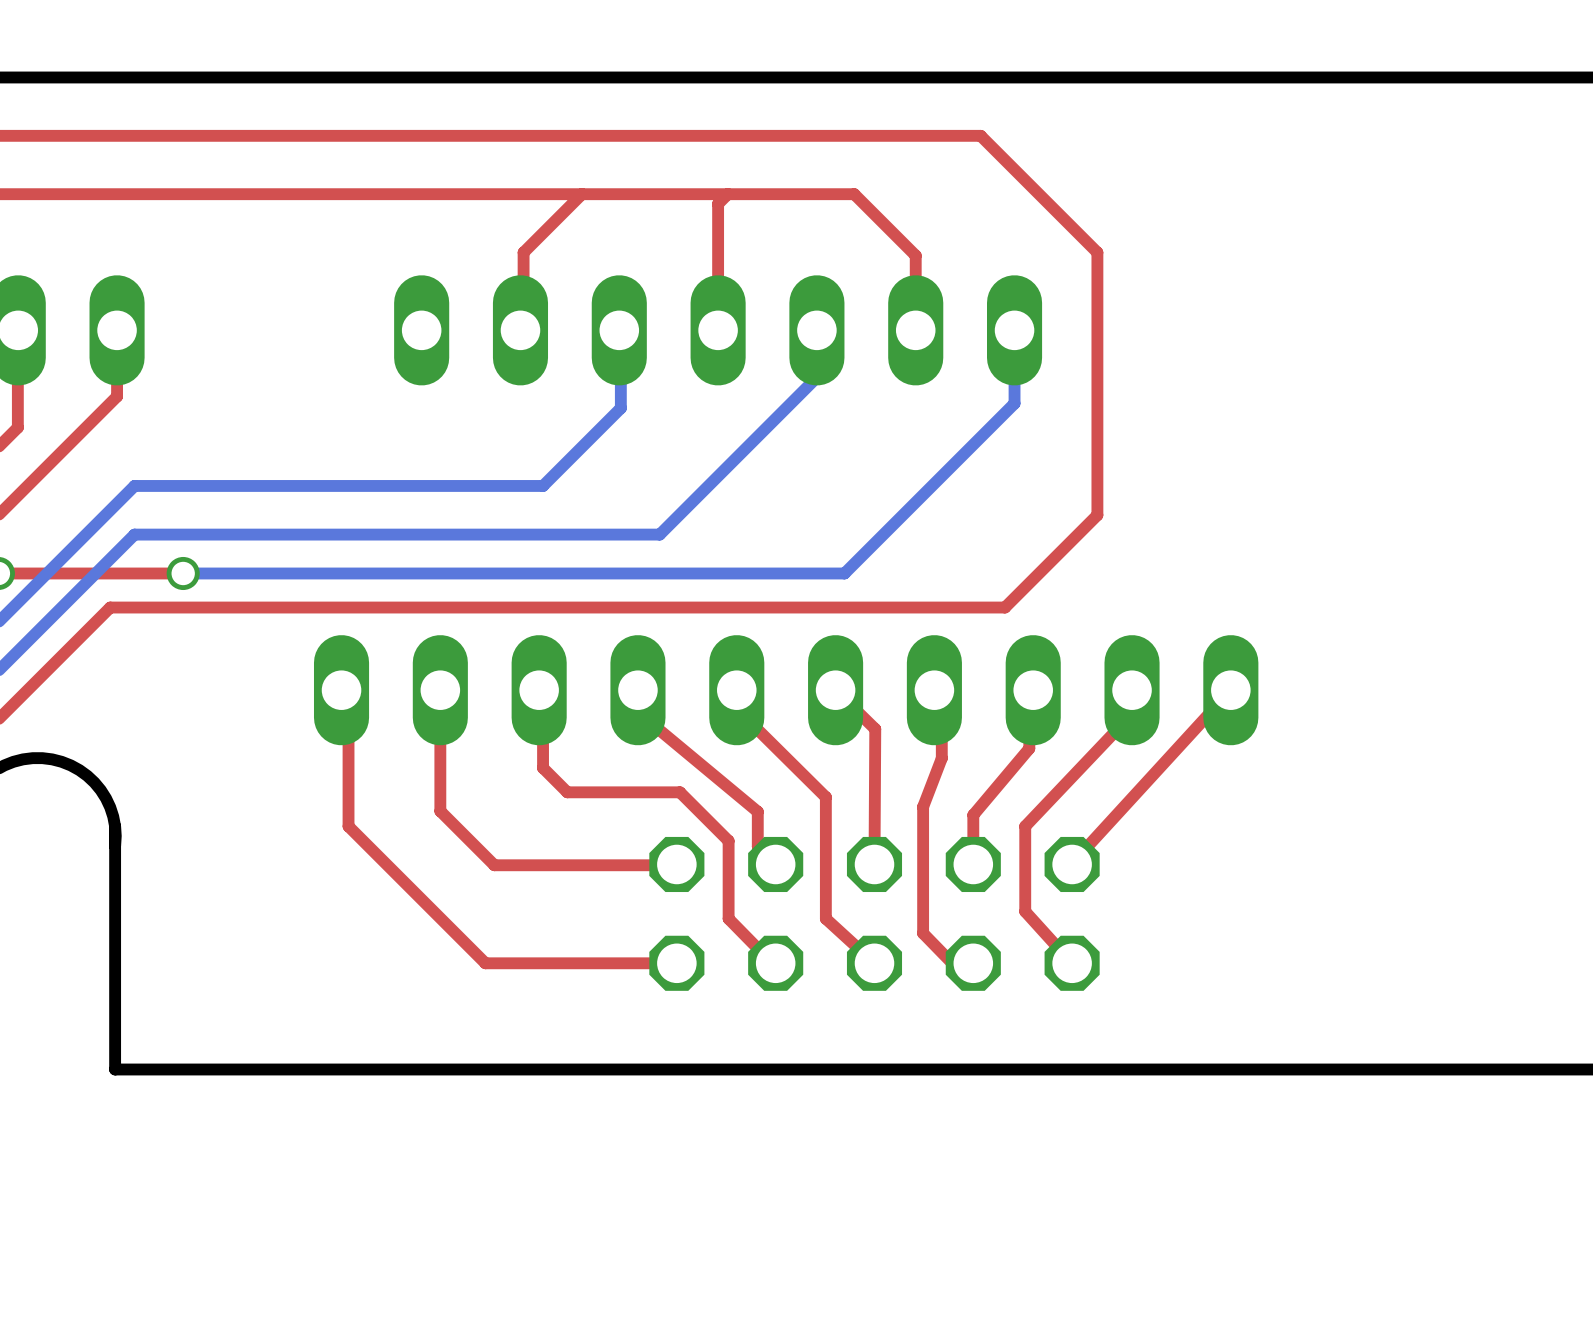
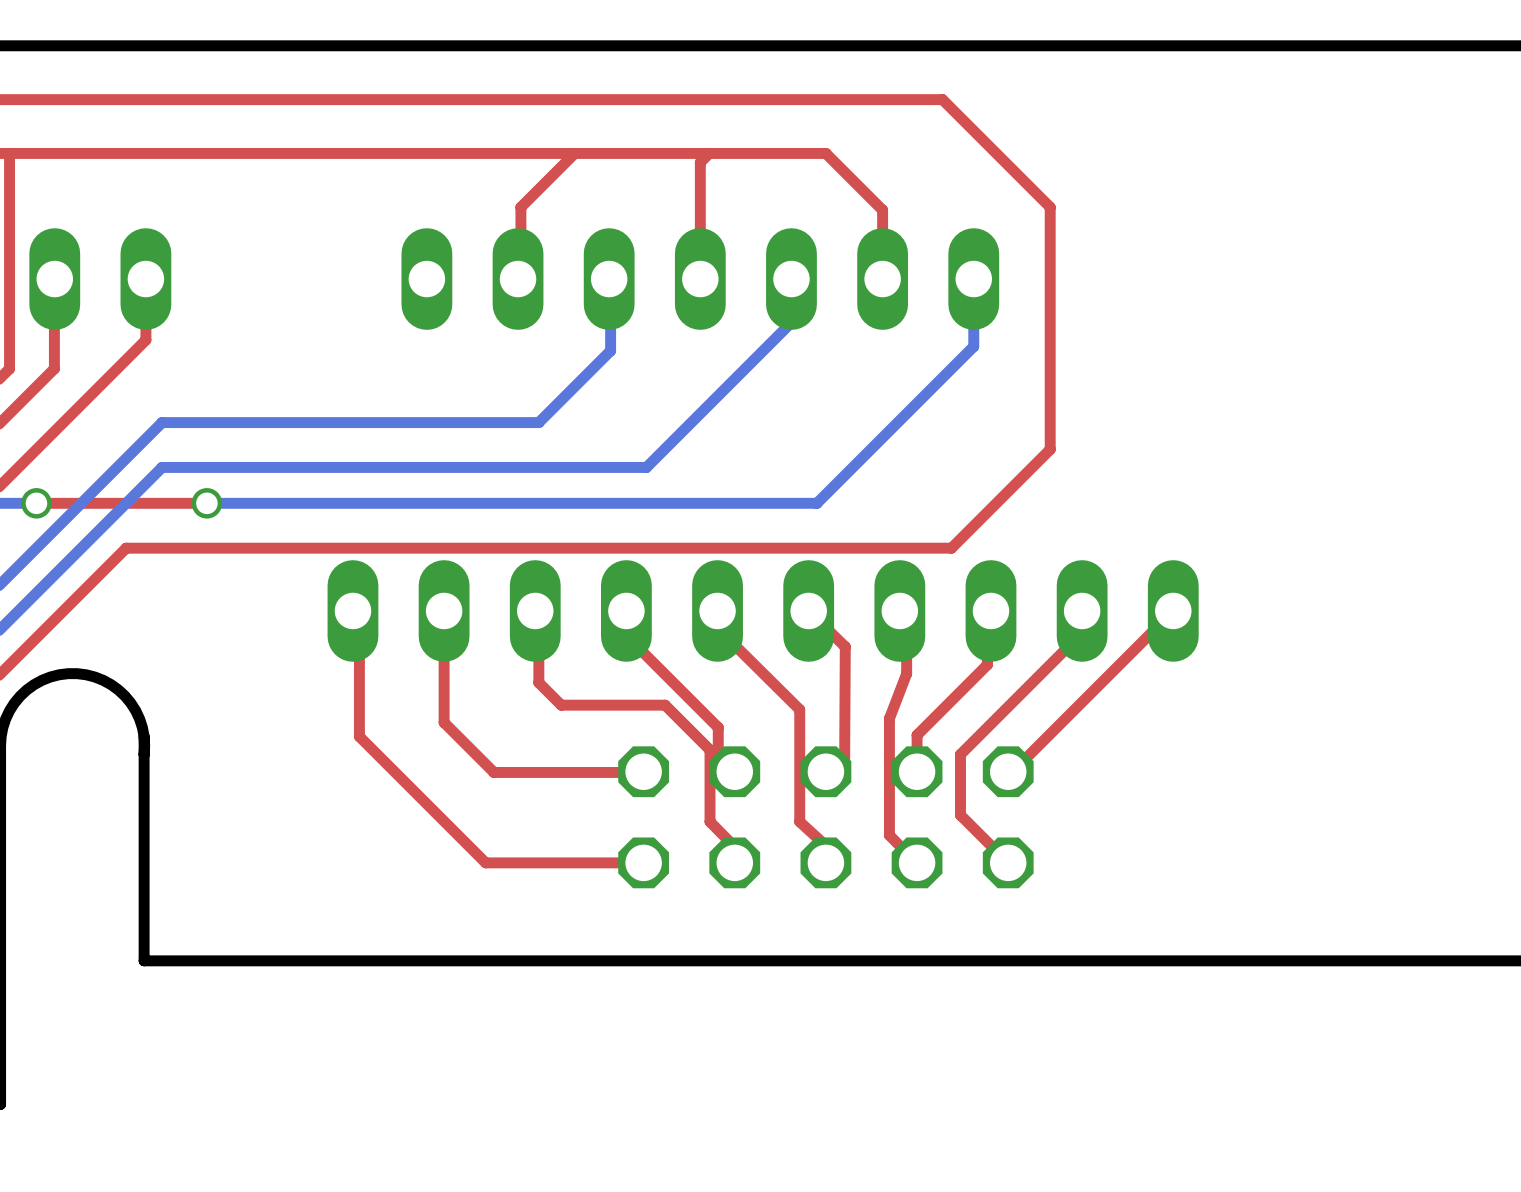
top track: (1005, 607) (110, 607) (95, 622) -> (964, 534) (951, 548) (126, 548)
top track: (1230, 690) (1072, 864) -> (1173, 610) (1012, 771) (1008, 771)
top track: (637, 712) (757, 811) (757, 846) (775, 864) -> (626, 631) (626, 635) (718, 727) (718, 755) (734, 771)
top track: (1132, 713) (1025, 826) (1025, 911) (1072, 963) -> (1082, 632) (960, 754) (960, 815) (1008, 862)
top track: (1029, 748) (973, 815) (973, 864) -> (987, 664) (917, 735) (917, 771)
part position: (874, 913) -> (825, 817)

